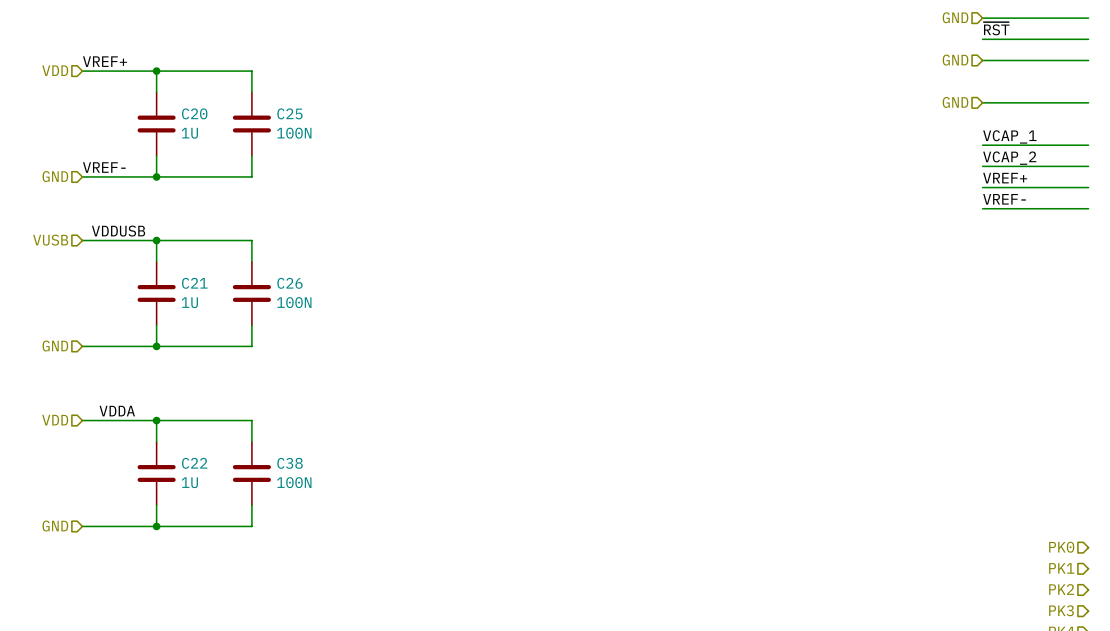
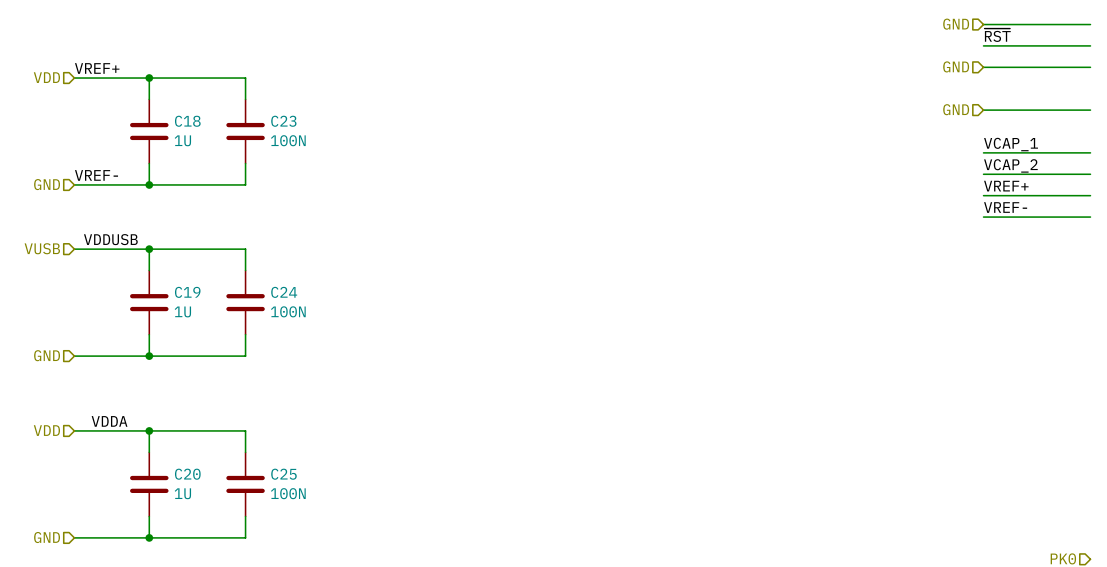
C20 name: C20 (194, 113) -> C18 (187, 121)
C25 name: C25 (289, 113) -> C23 (283, 121)
C21 name: C21 (194, 283) -> C19 (187, 292)
C26 name: C26 (289, 283) -> C24 (284, 292)
C22 name: C22 (194, 463) -> C20 (187, 474)
C38 name: C38 (290, 463) -> C25 (283, 474)

